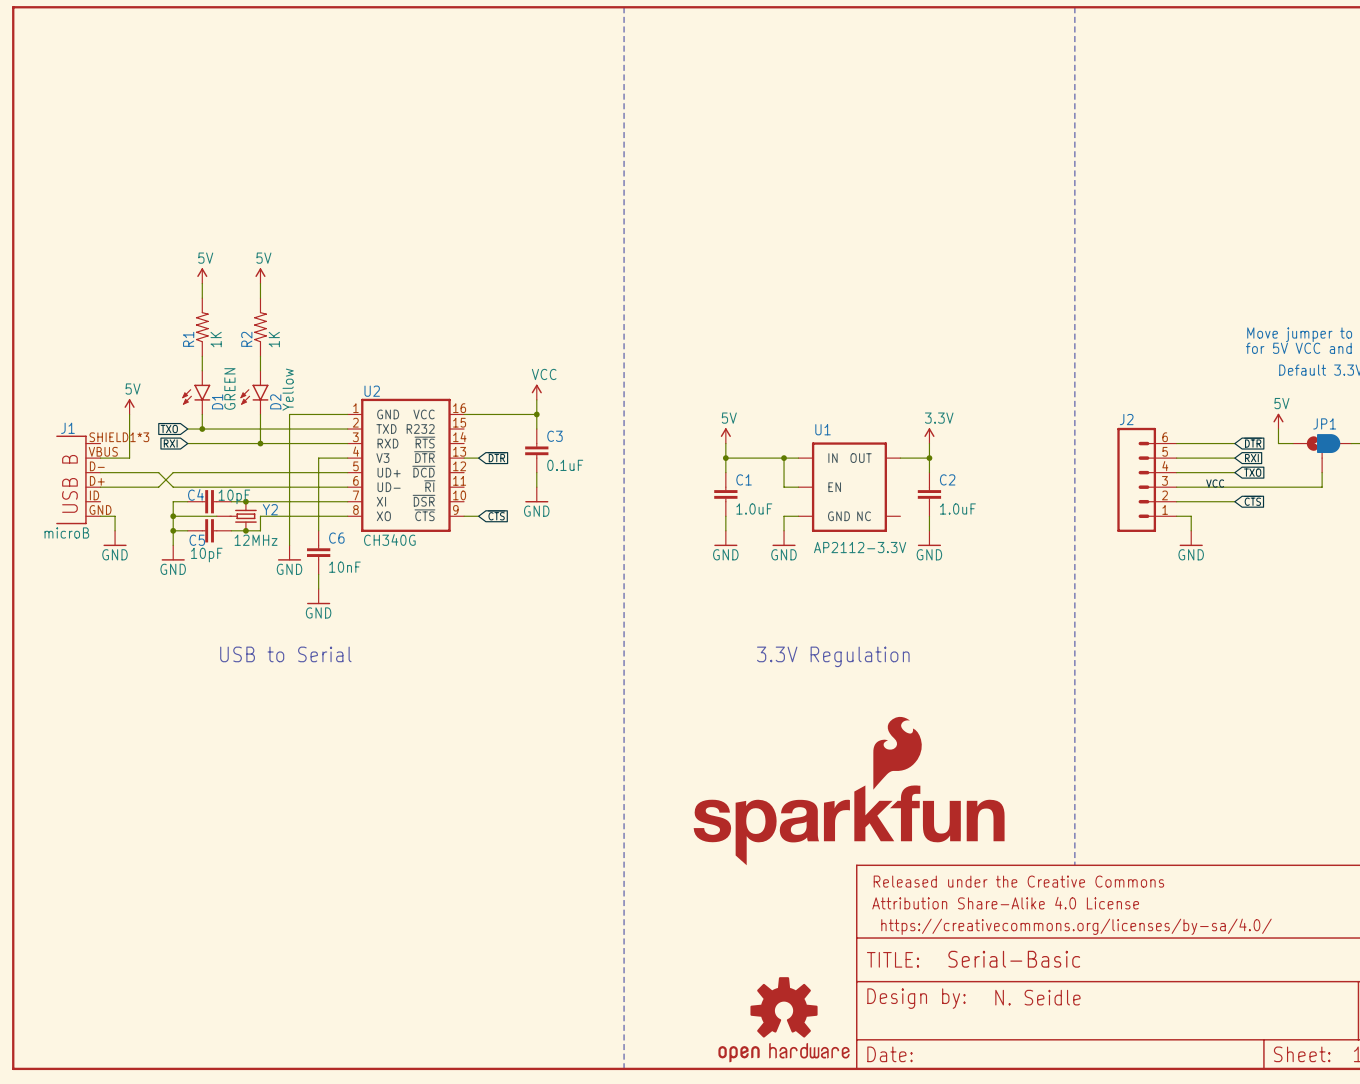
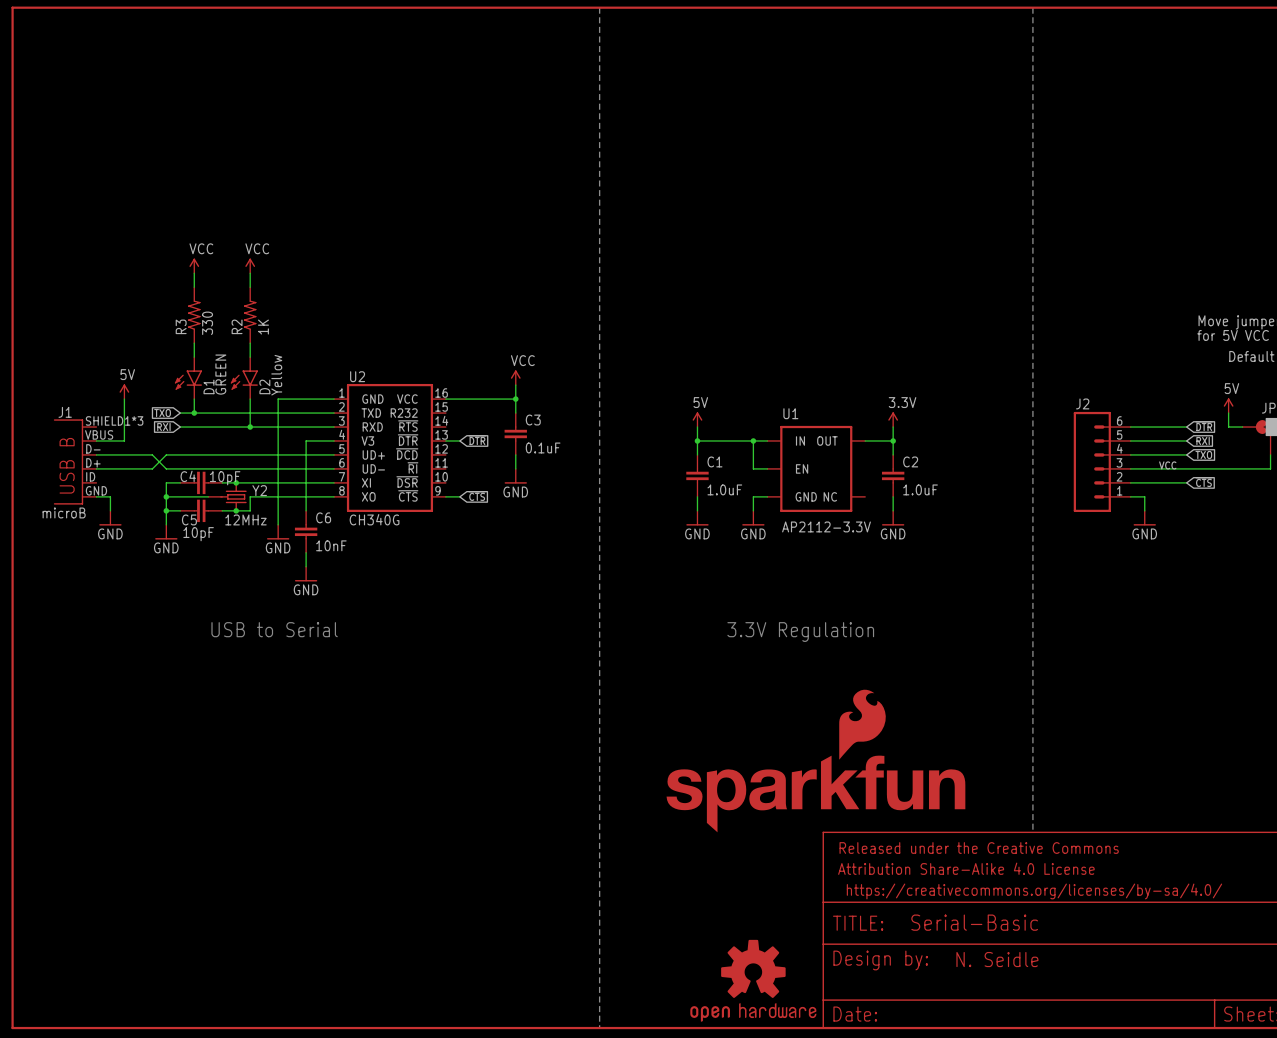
power symbol: 5V (202, 275) -> VCC (194, 265)
power symbol: 5V (260, 275) -> VCC (250, 265)
R1 name: R1 (188, 339) -> R3 (181, 326)
R1 value: 1K (216, 339) -> 330 (207, 323)

